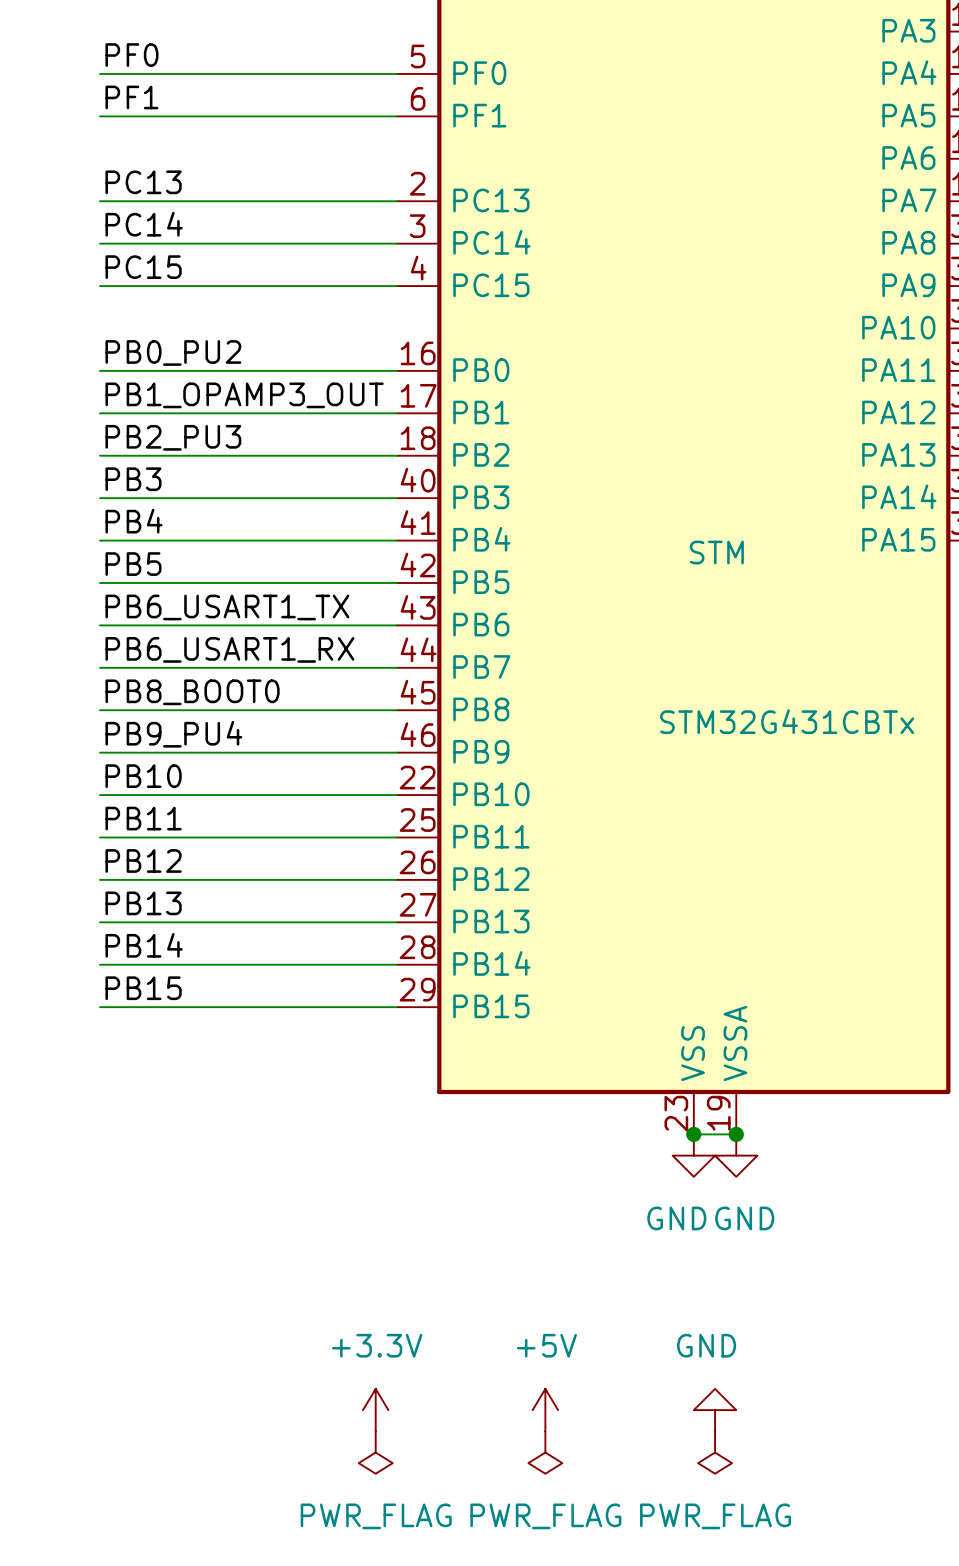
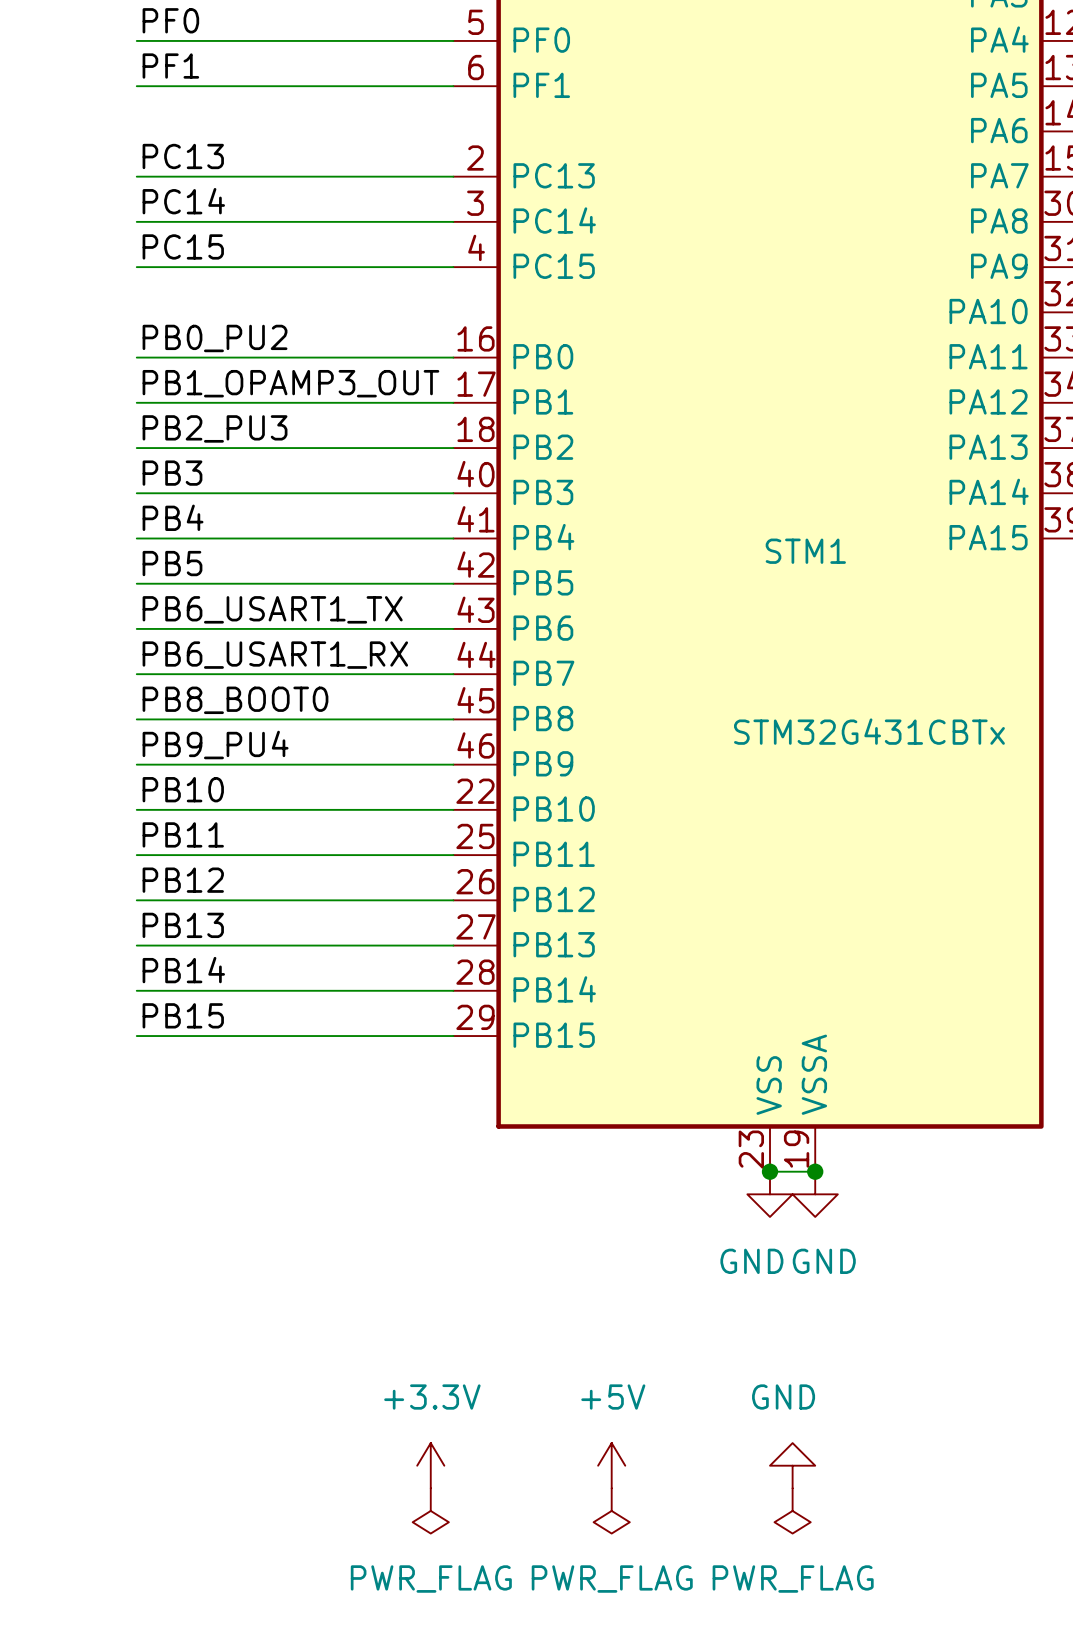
STM name: STM (716, 552) -> STM1 (805, 551)

